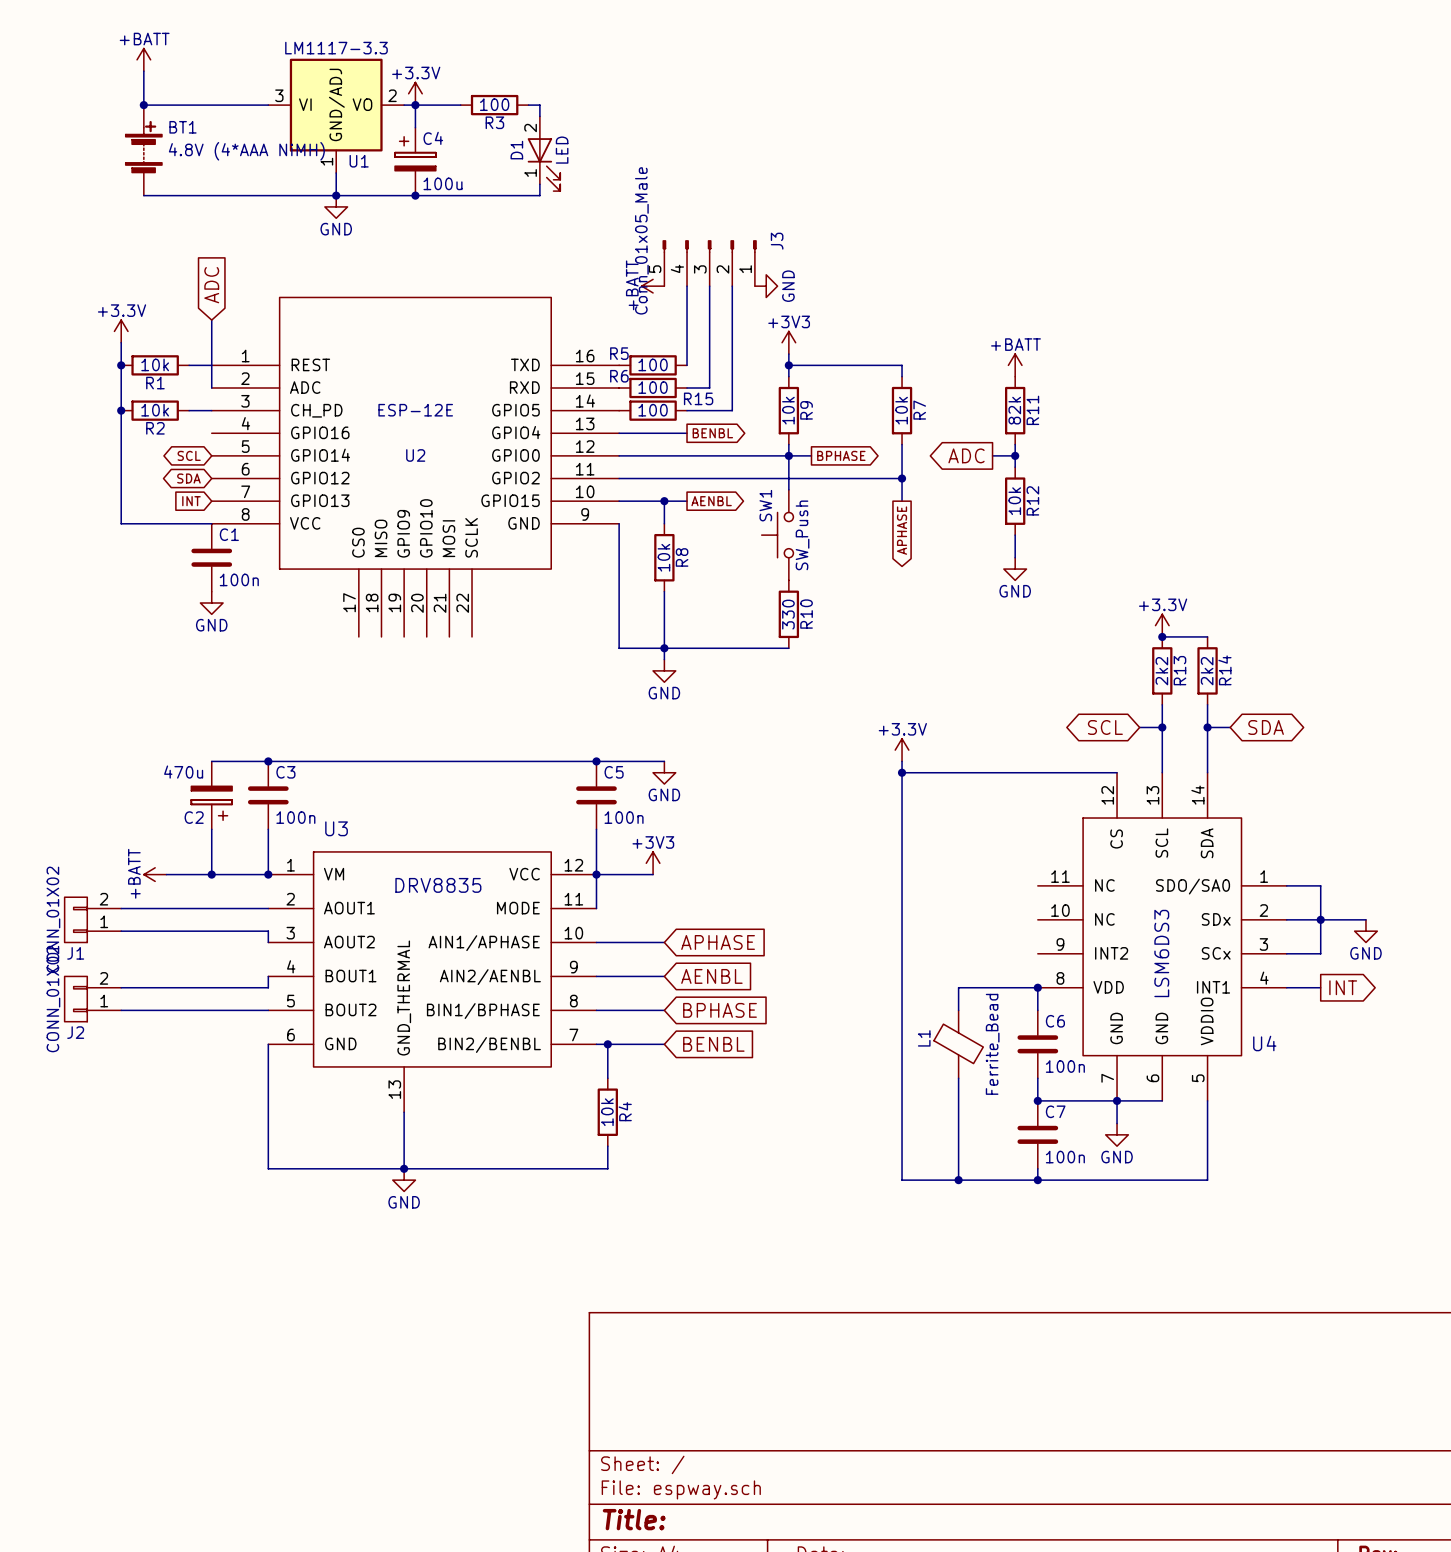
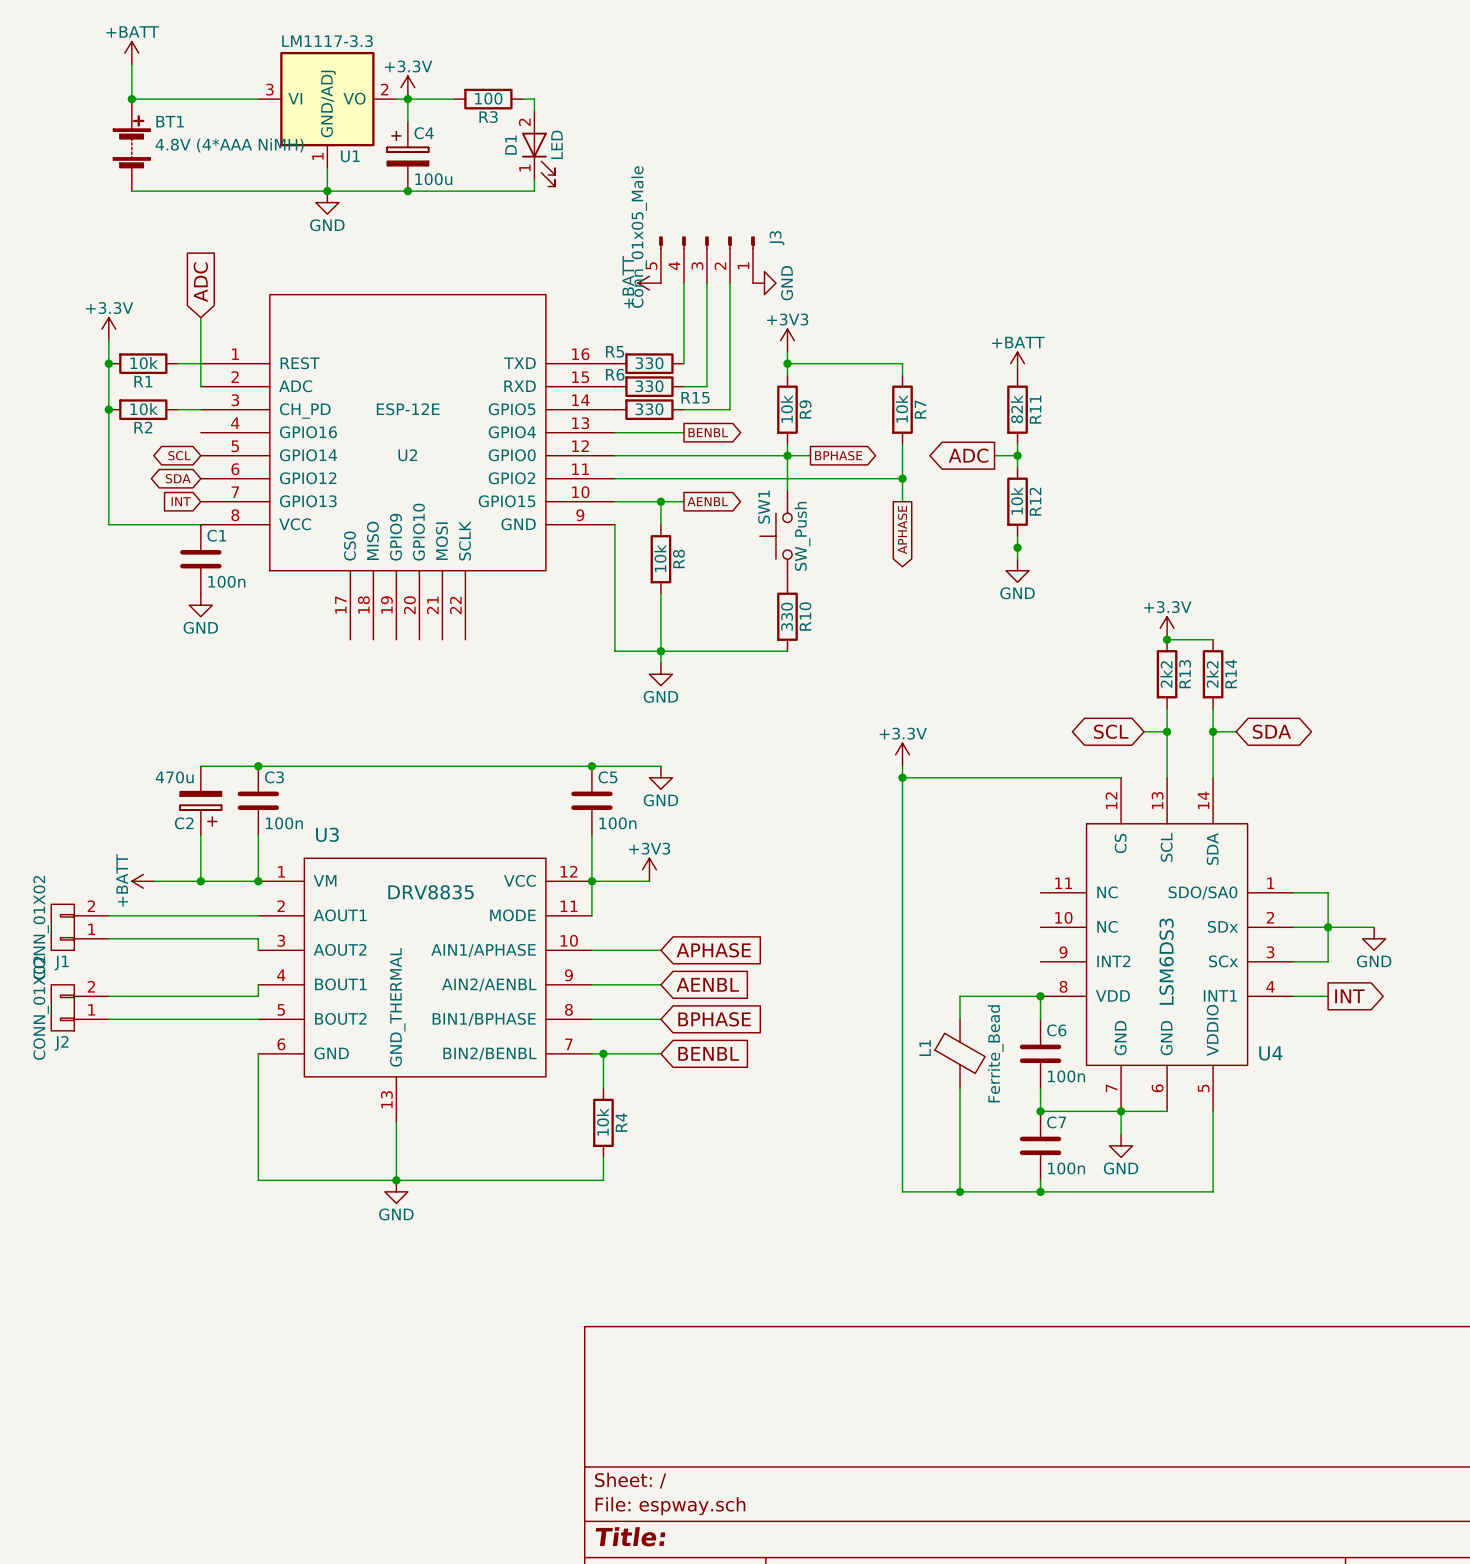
R5 value: 100 (653, 364) -> 330 (649, 363)
R6 value: 100 (653, 387) -> 330 (649, 386)
R15 value: 100 (653, 410) -> 330 (649, 409)
junction: none -> (1017, 547)

